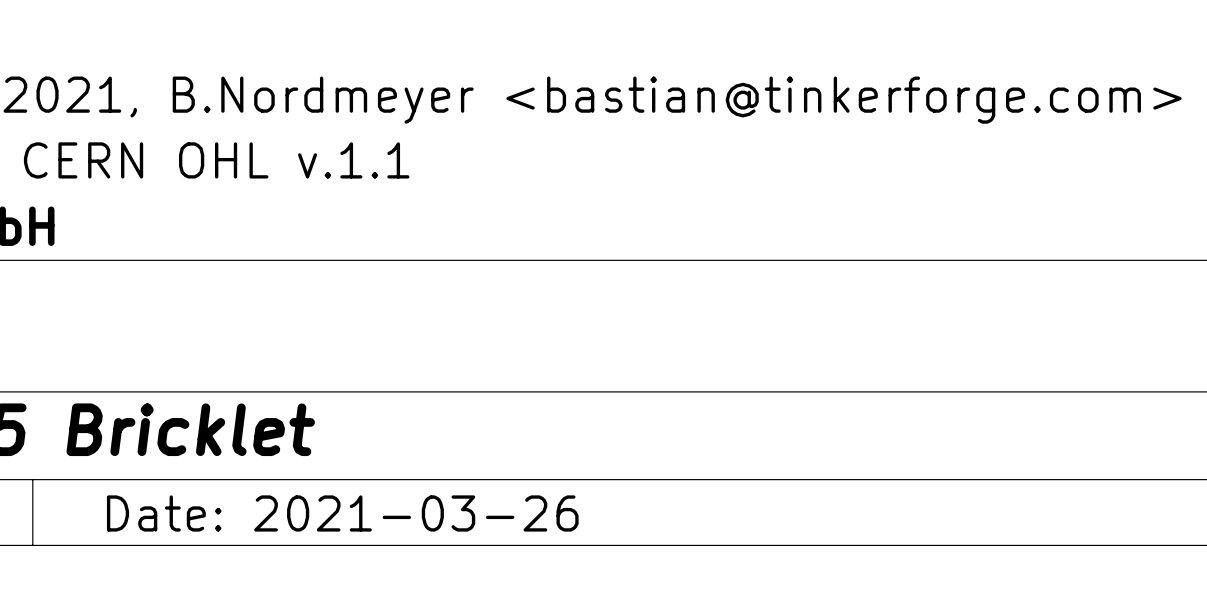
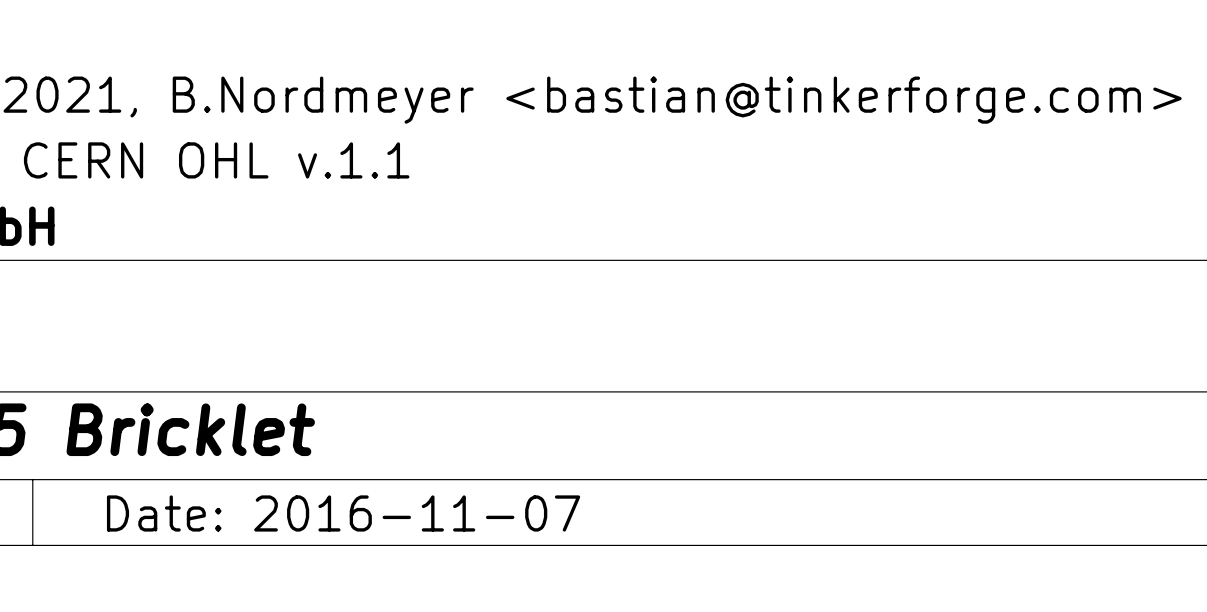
title block: Date: 2021-03-26 (342, 513) -> Date: 2016-11-07 (343, 513)

